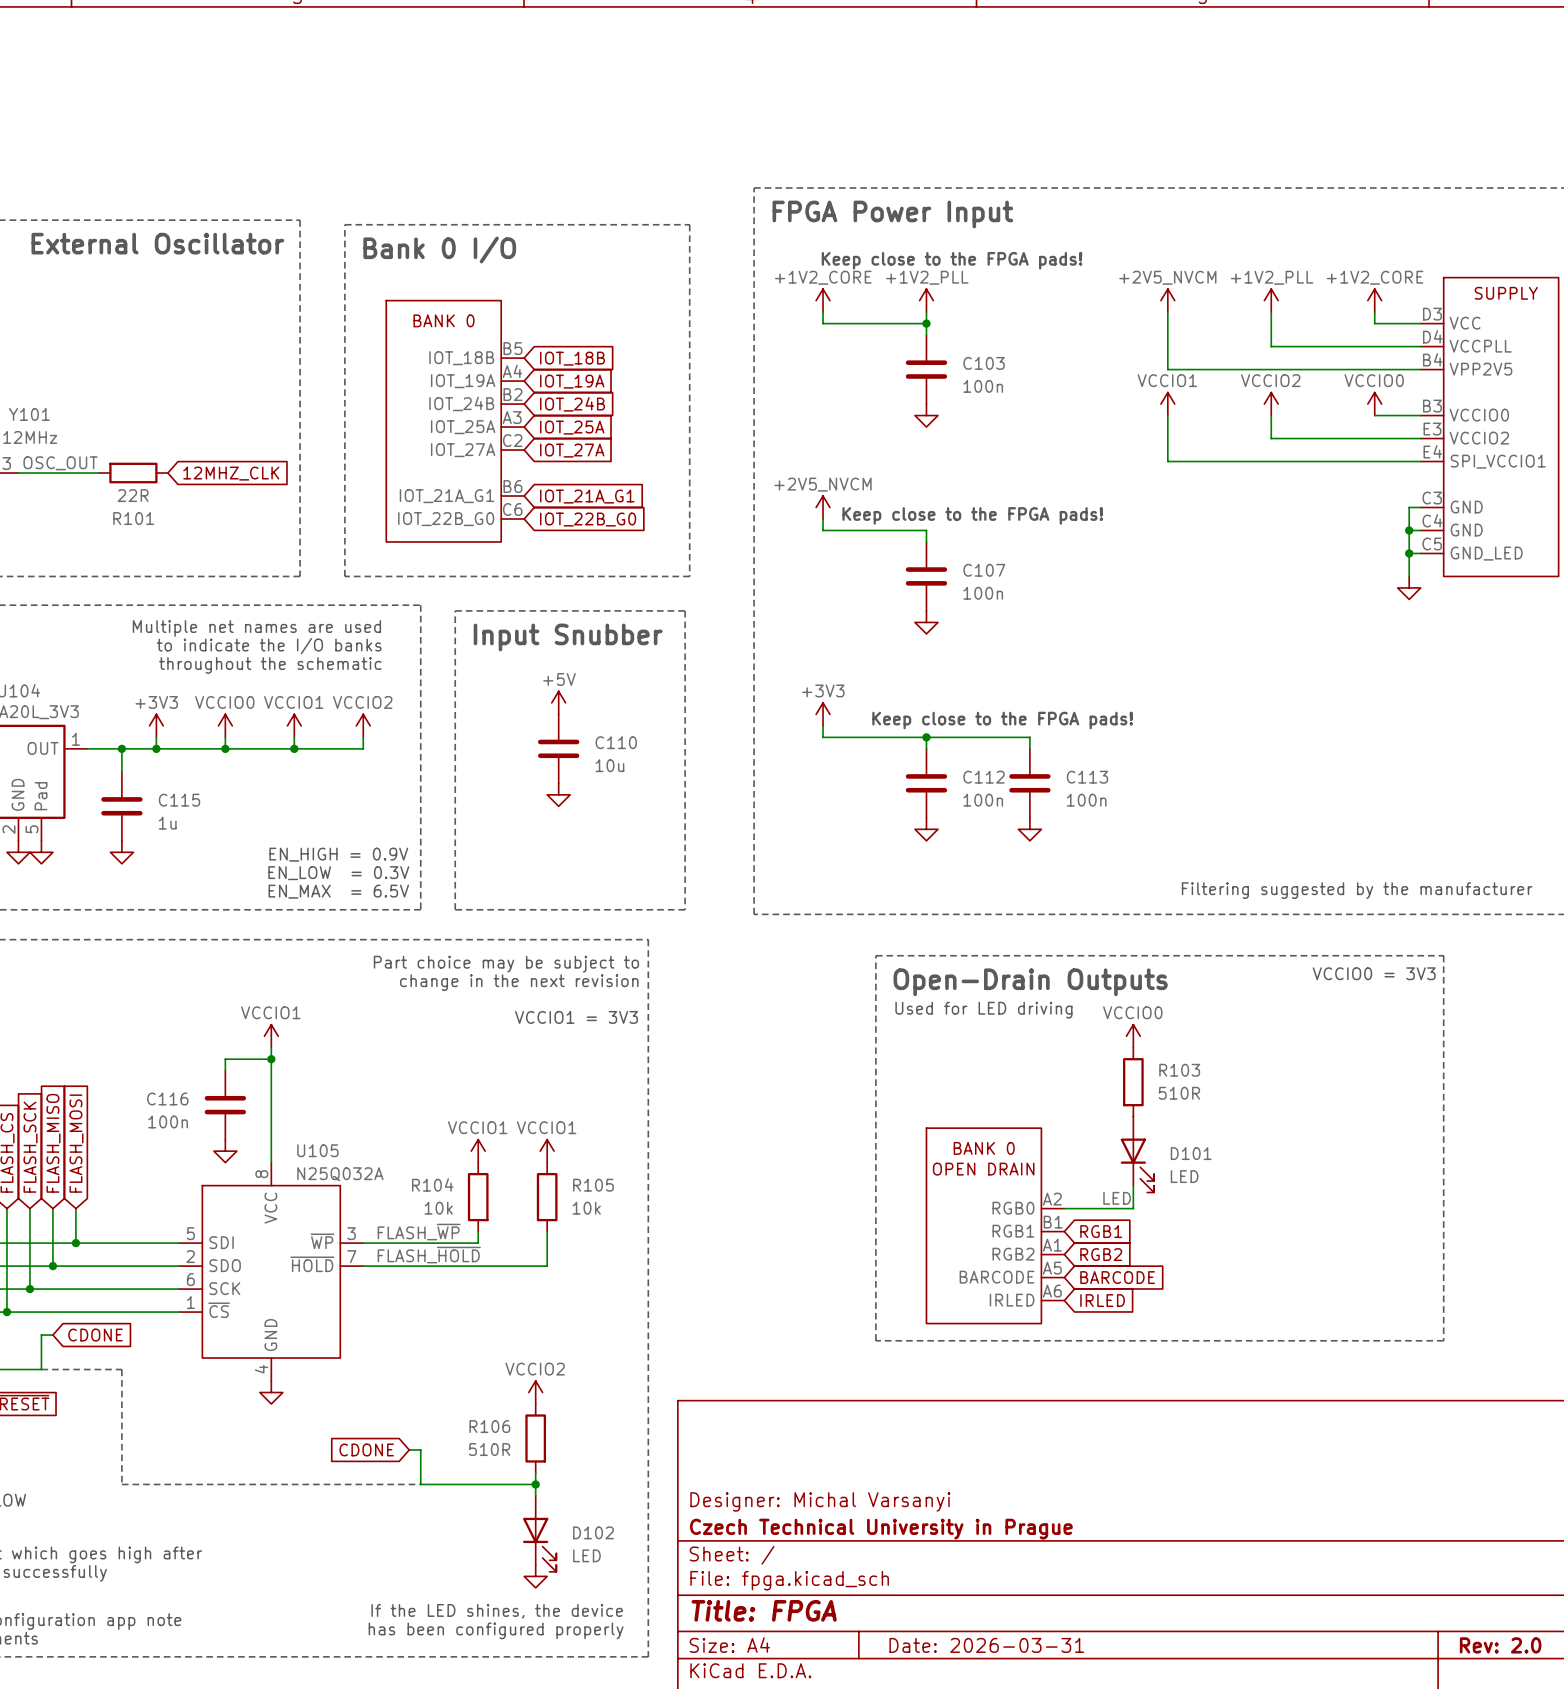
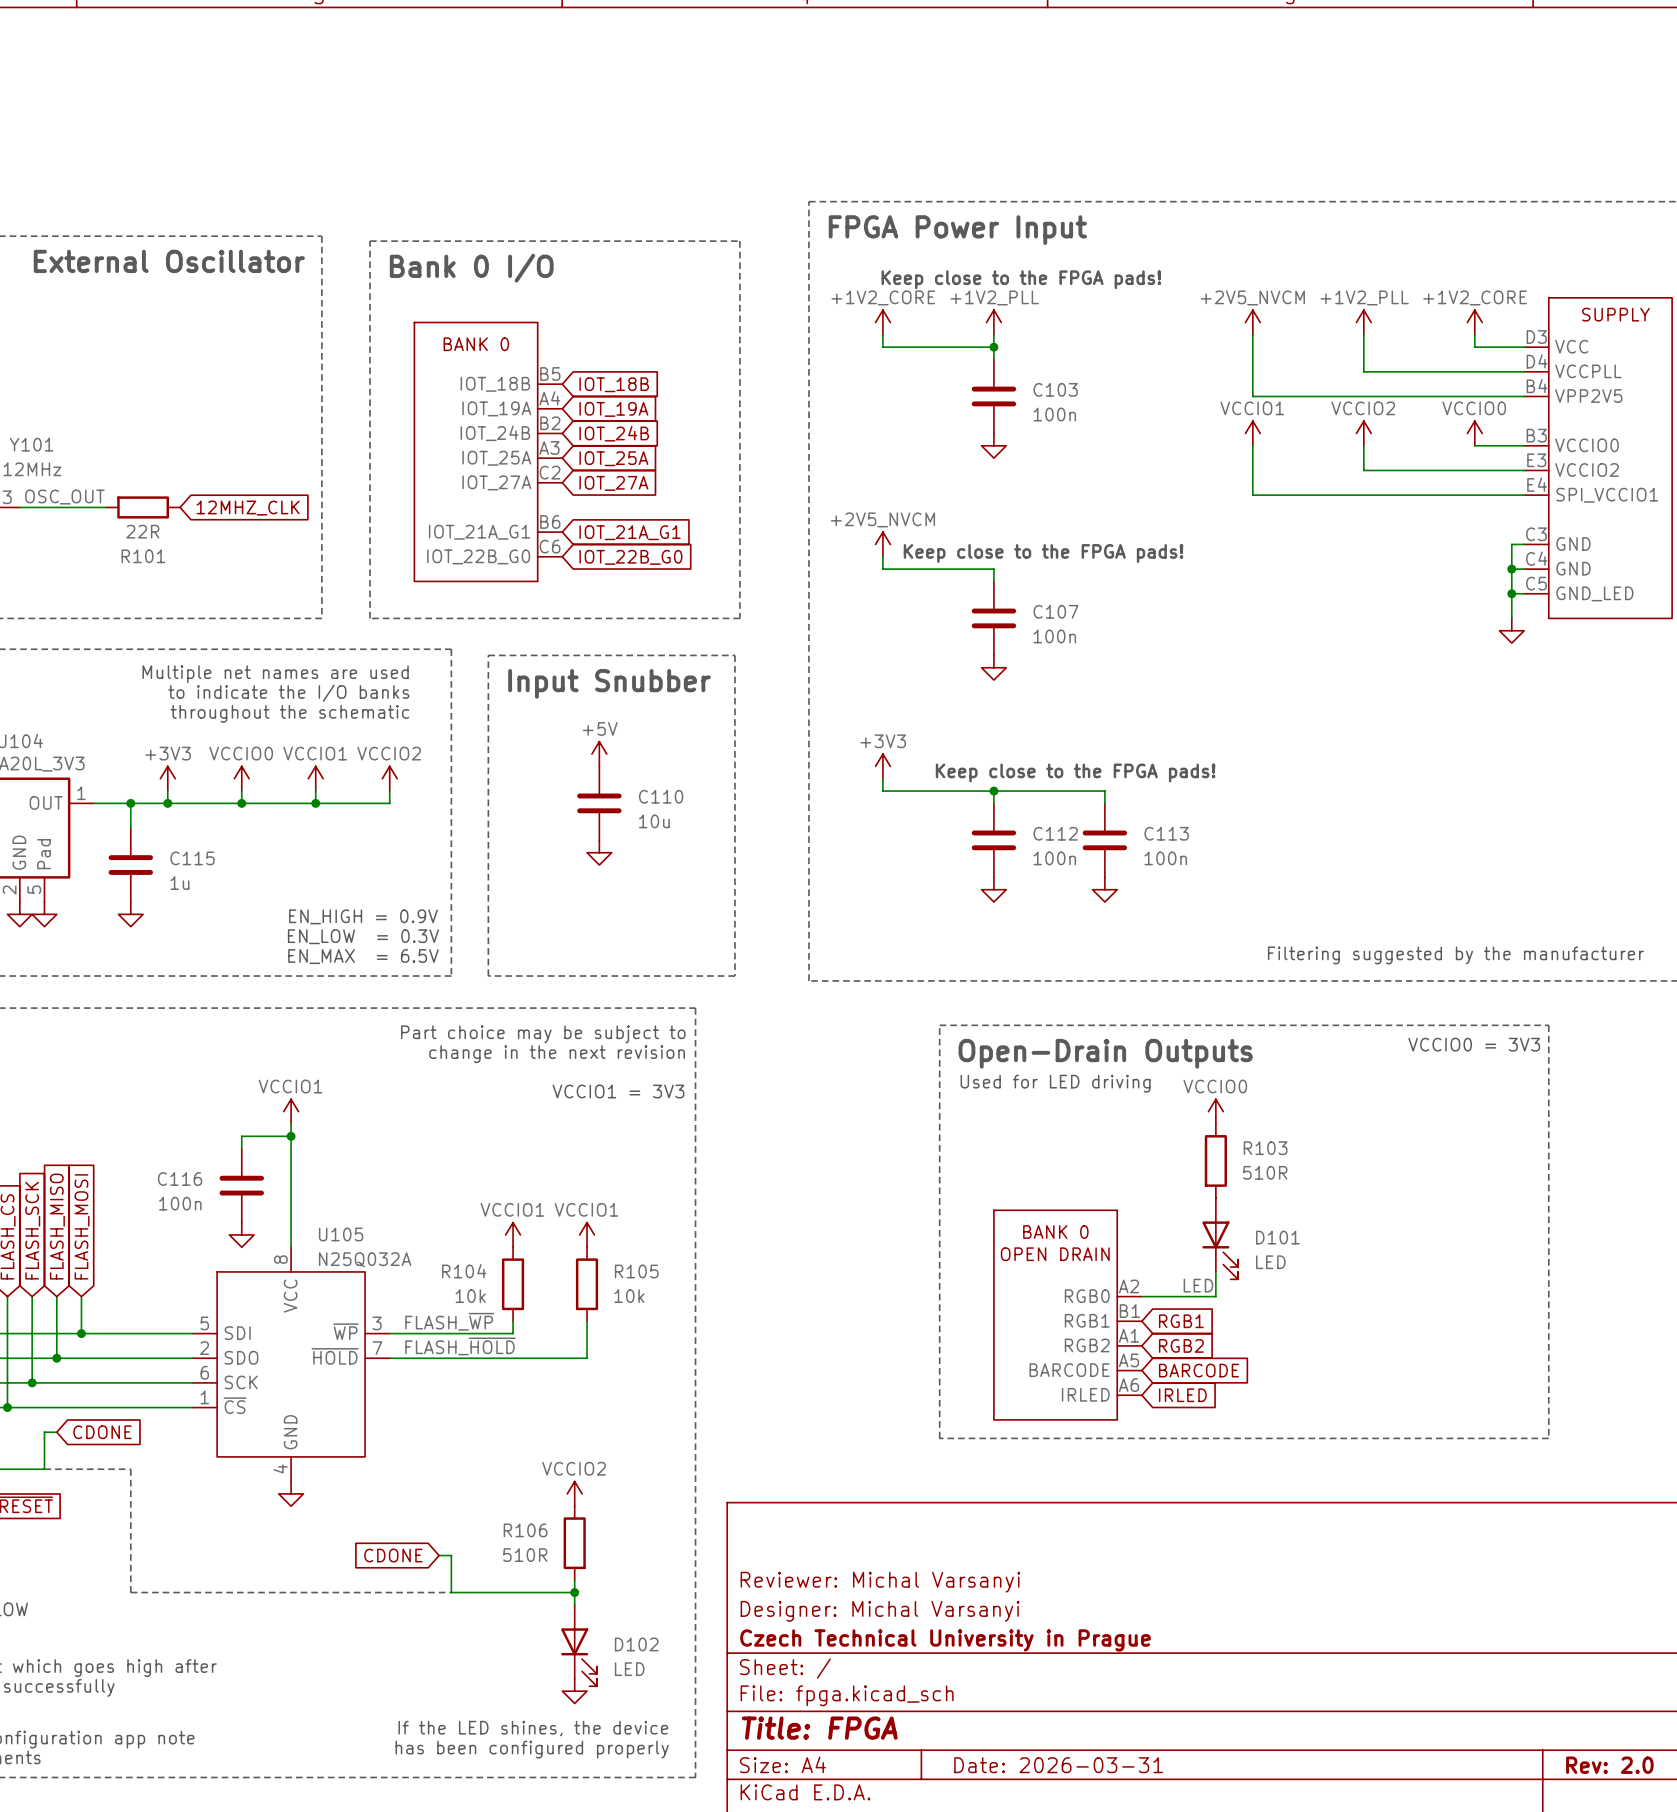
title block: none -> Reviewer: Michal Varsanyi (880, 1582)

